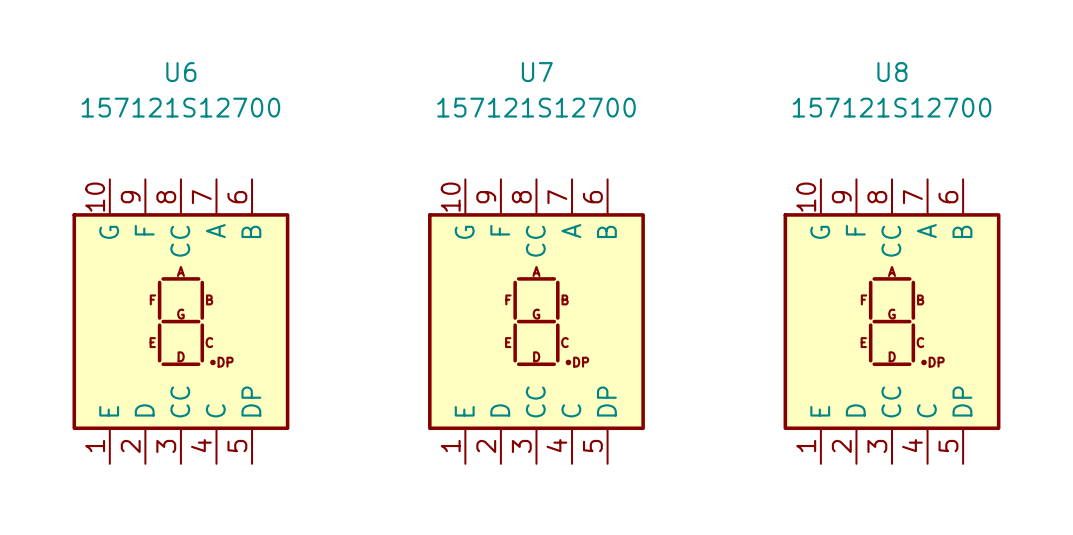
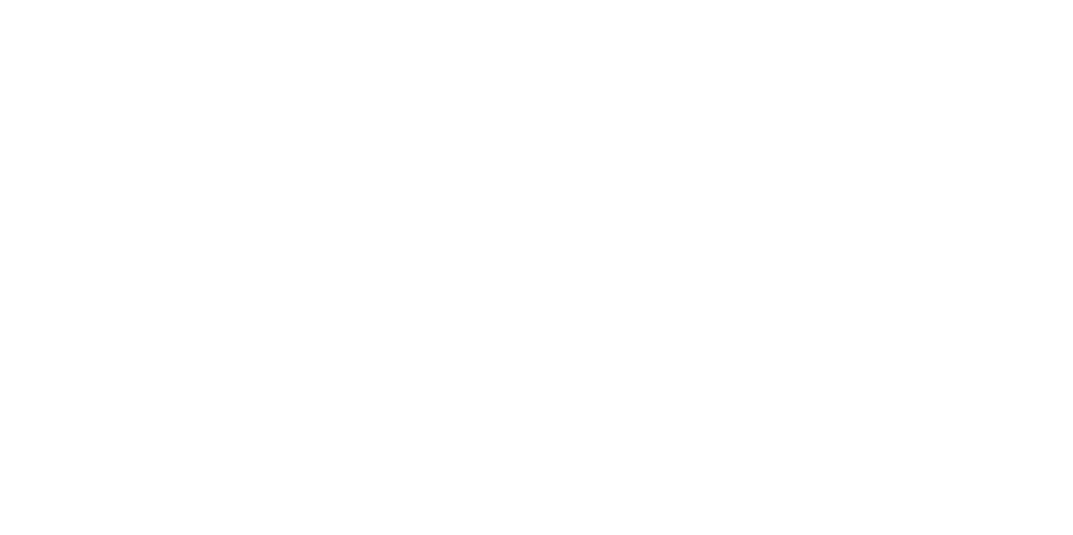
U6: 157121S12700 (180, 321) -> none
U7: 157121S12700 (536, 321) -> none
U8: 157121S12700 (892, 321) -> none

